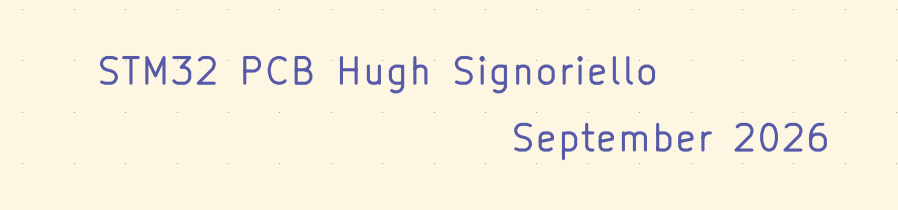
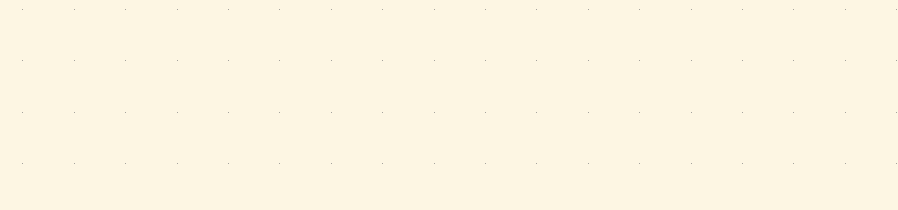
text: STM32 PCB Hugh Signoriello (377, 74) -> none
text: September 2026 (670, 141) -> none

